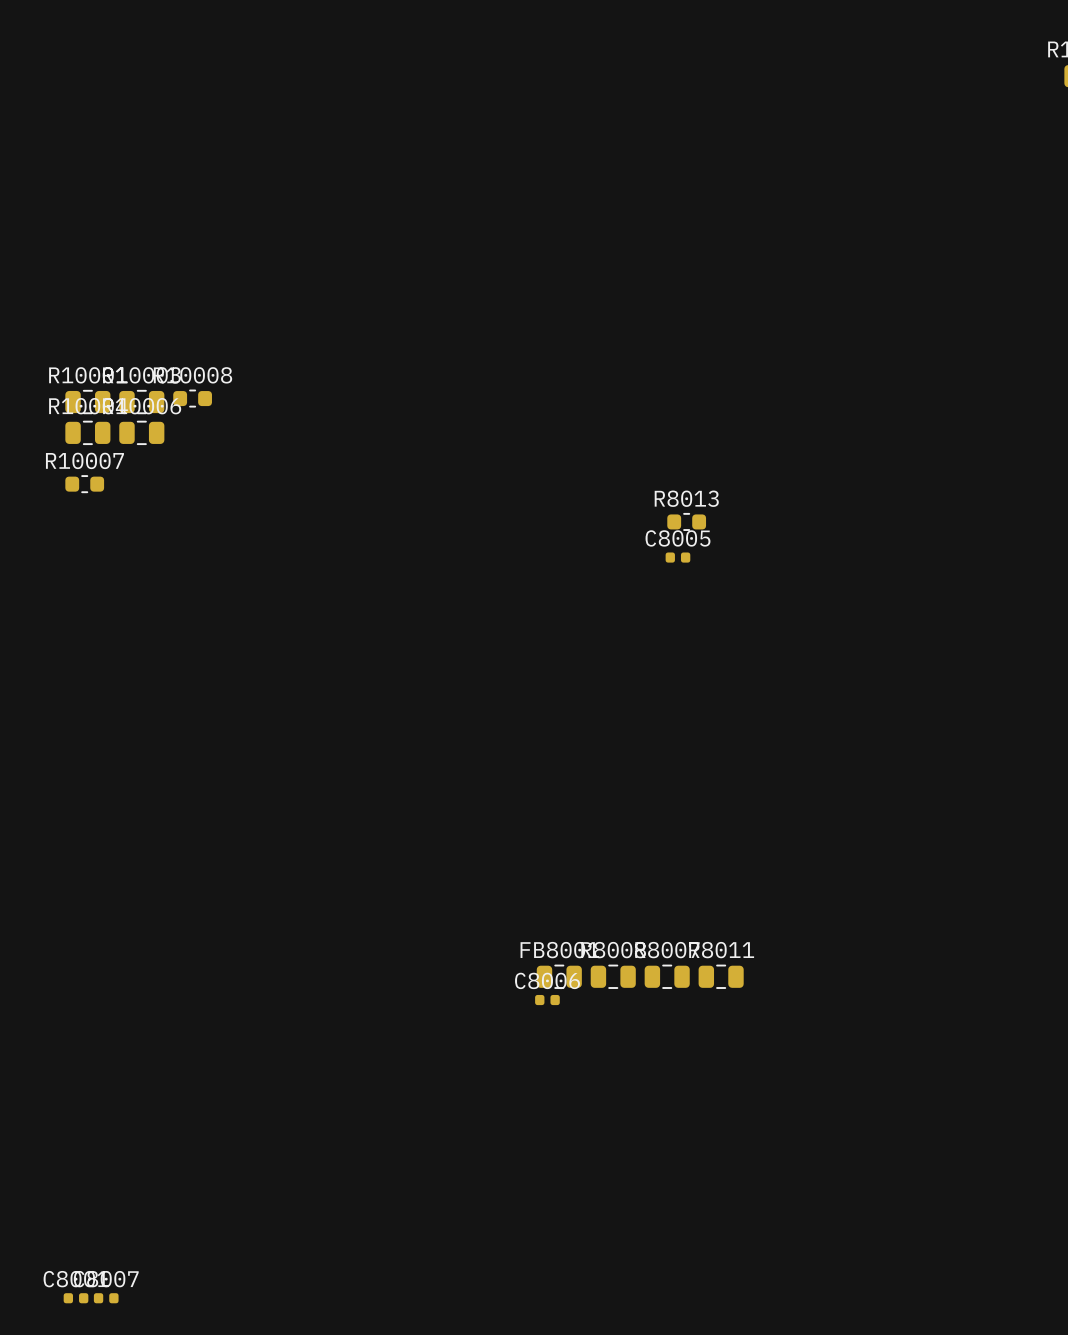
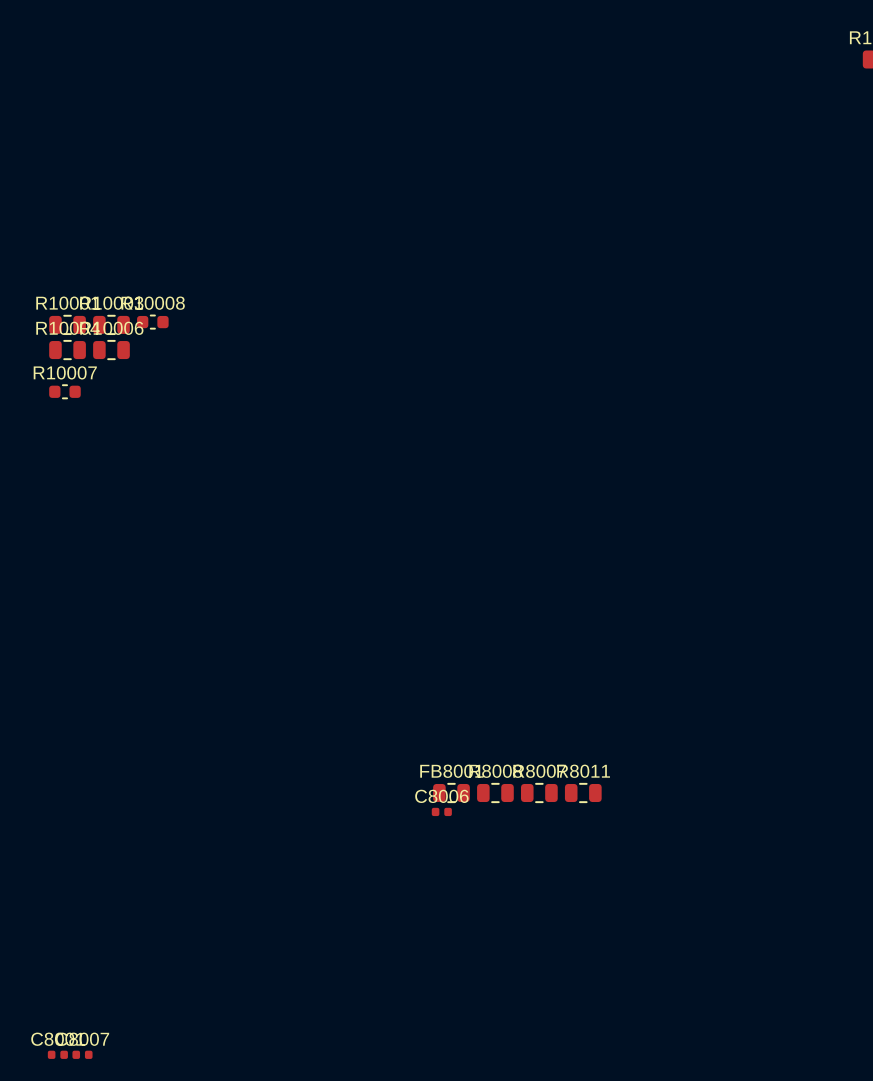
R8013: (686, 521) -> none
C8005: (677, 557) -> none

